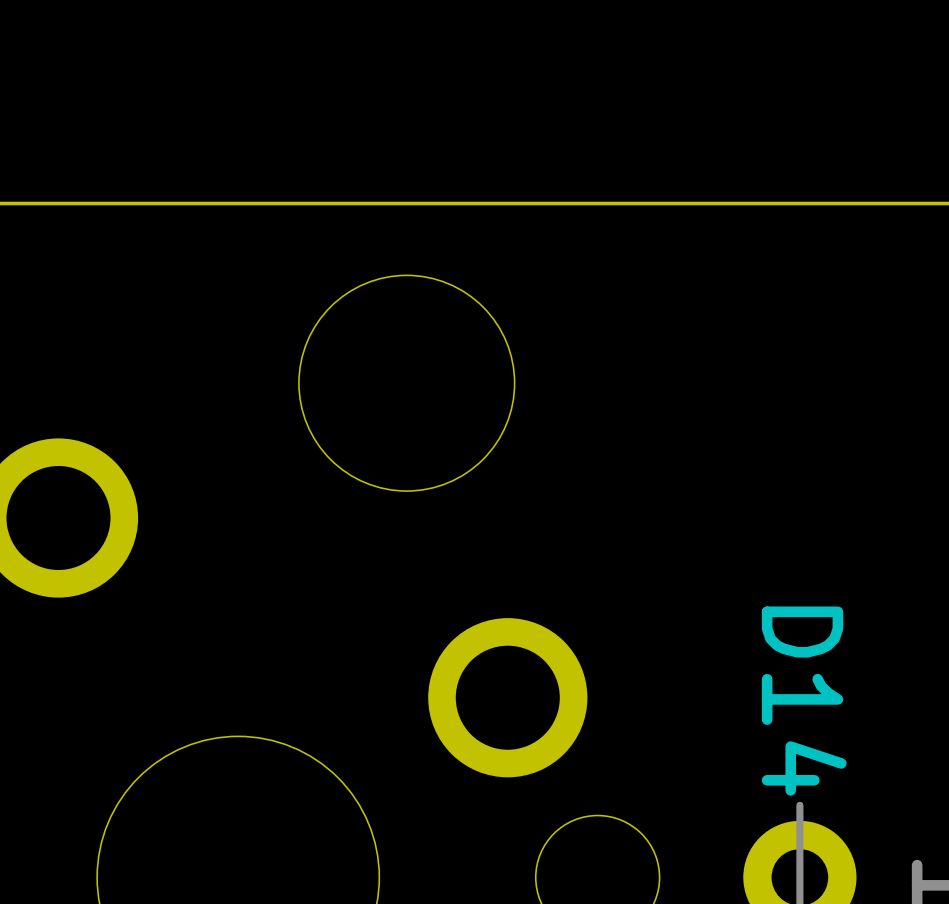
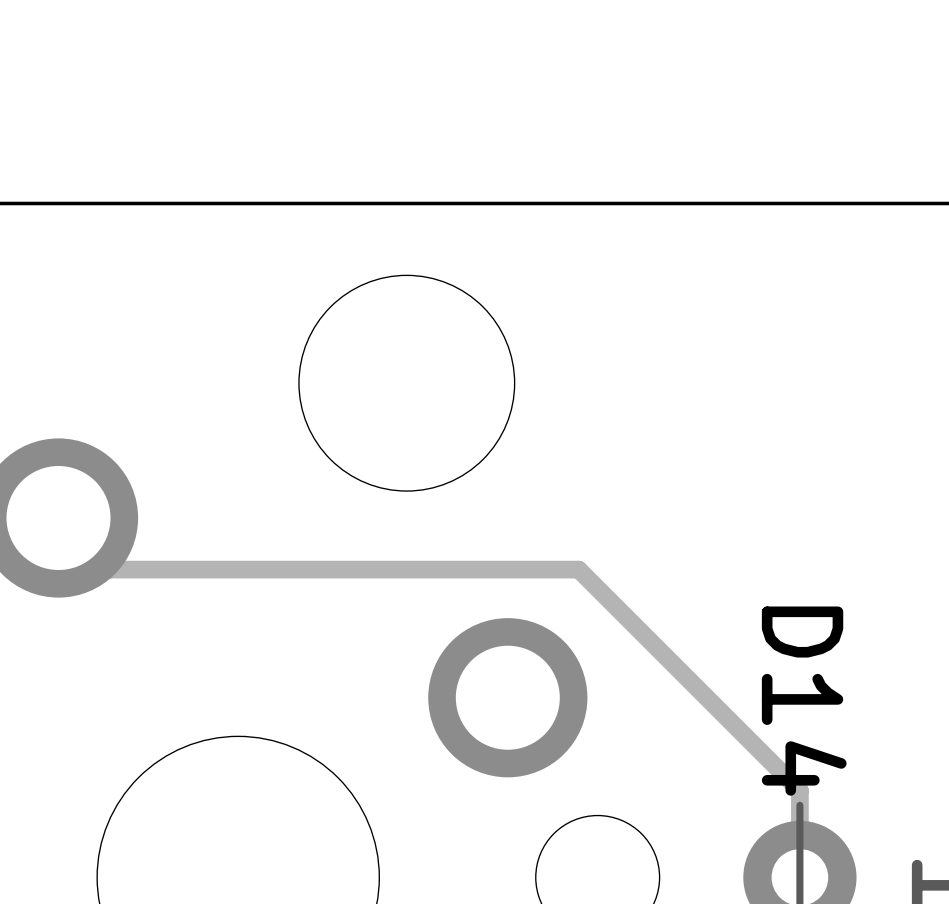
track: none -> (58, 518) (110, 569) (578, 569) (799, 790) (799, 877)

